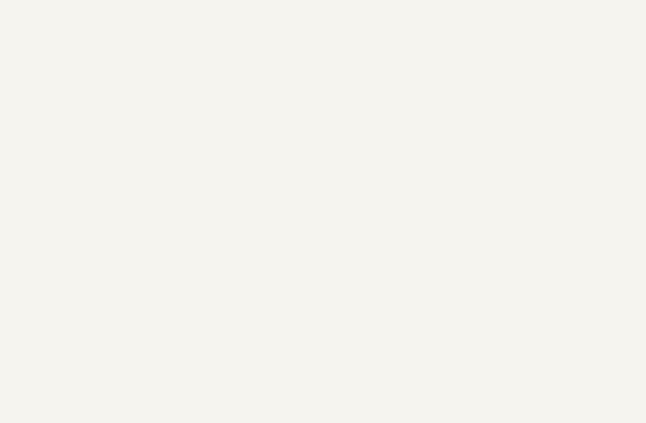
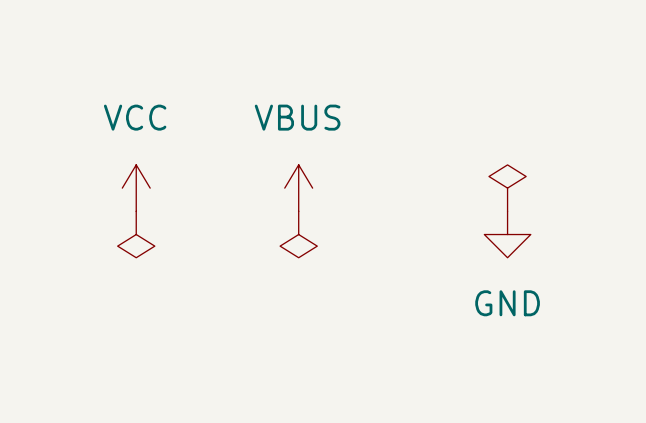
power symbol: none -> VCC (136, 188)
power symbol: none -> VBUS (298, 188)
power symbol: none -> (507, 188)
power symbol: none -> (136, 234)
power symbol: none -> (298, 234)
power symbol: none -> GND (507, 234)

